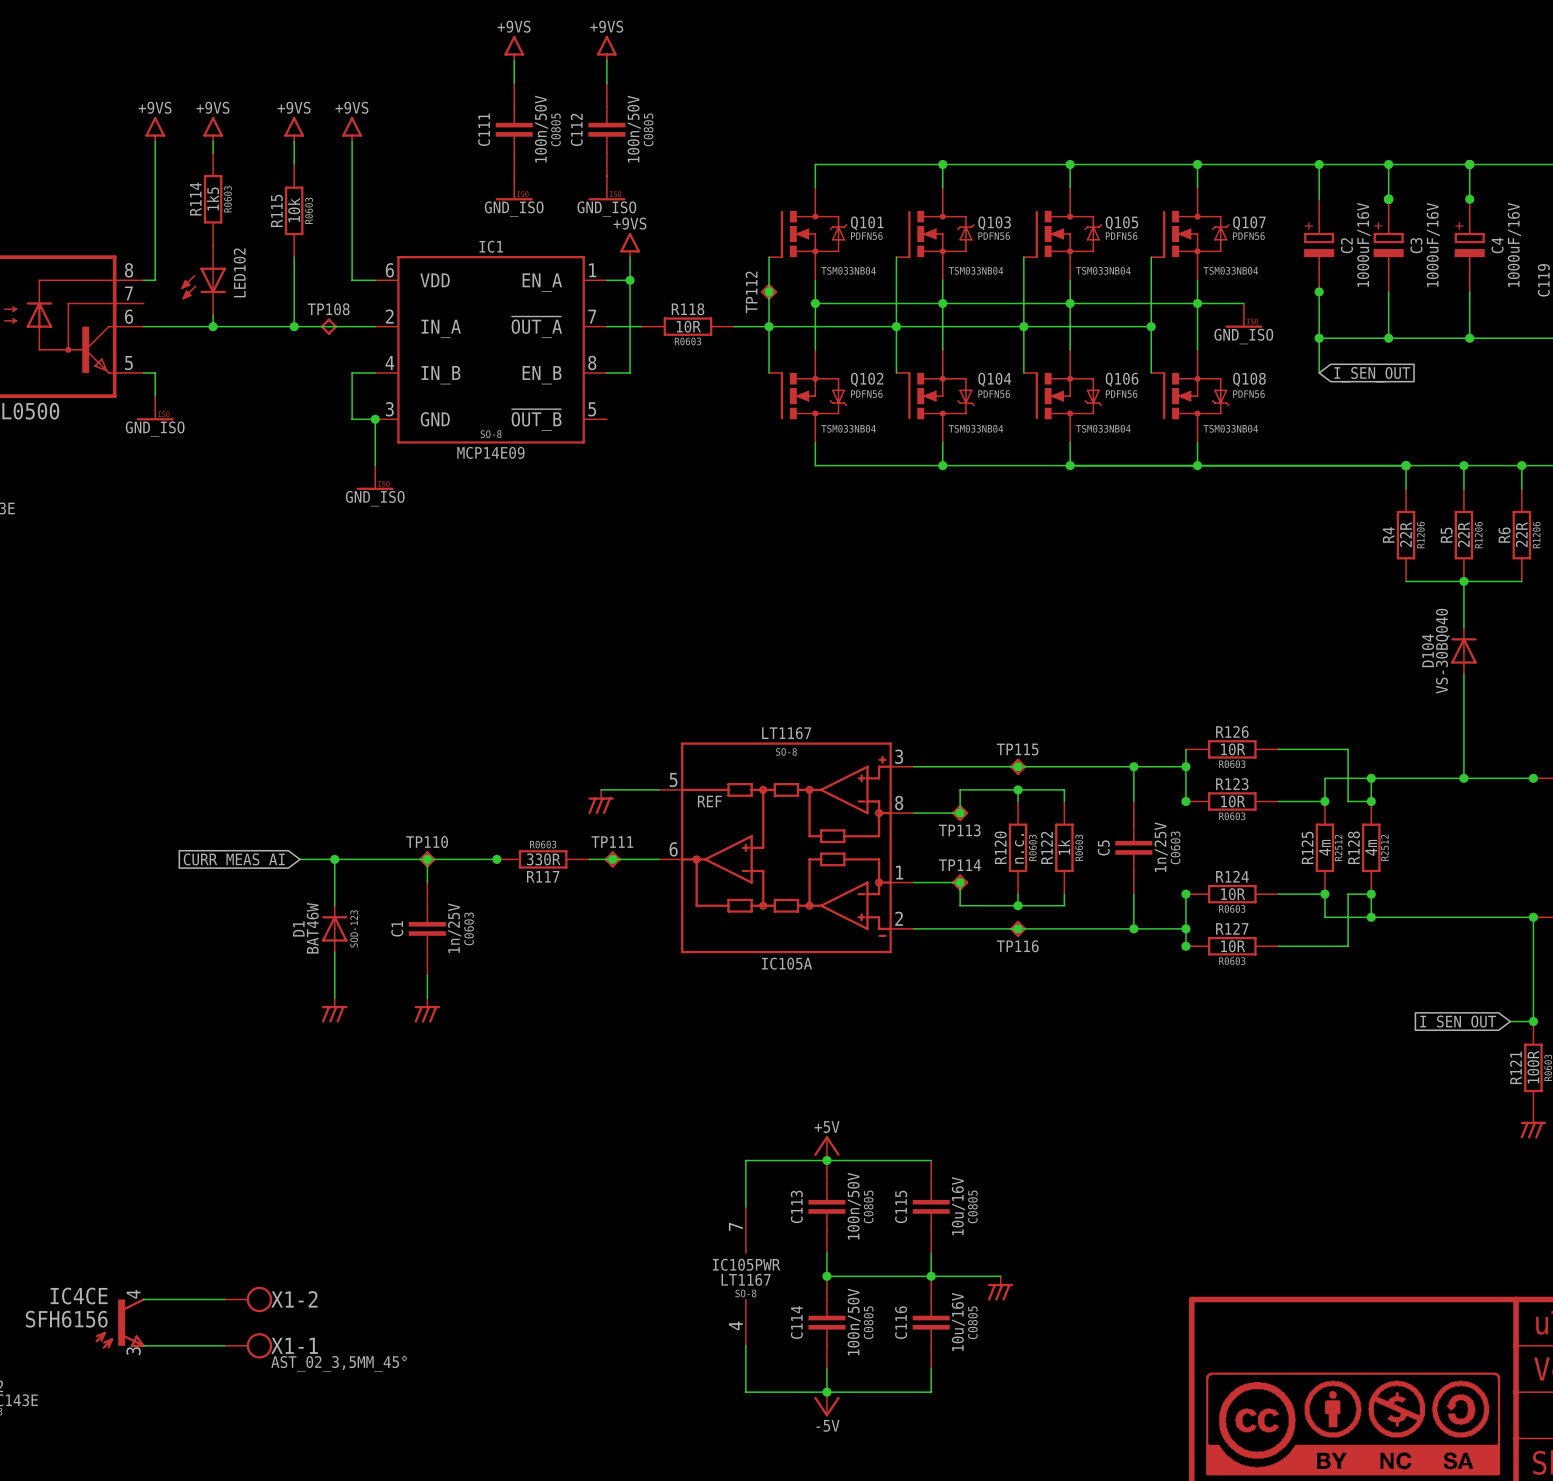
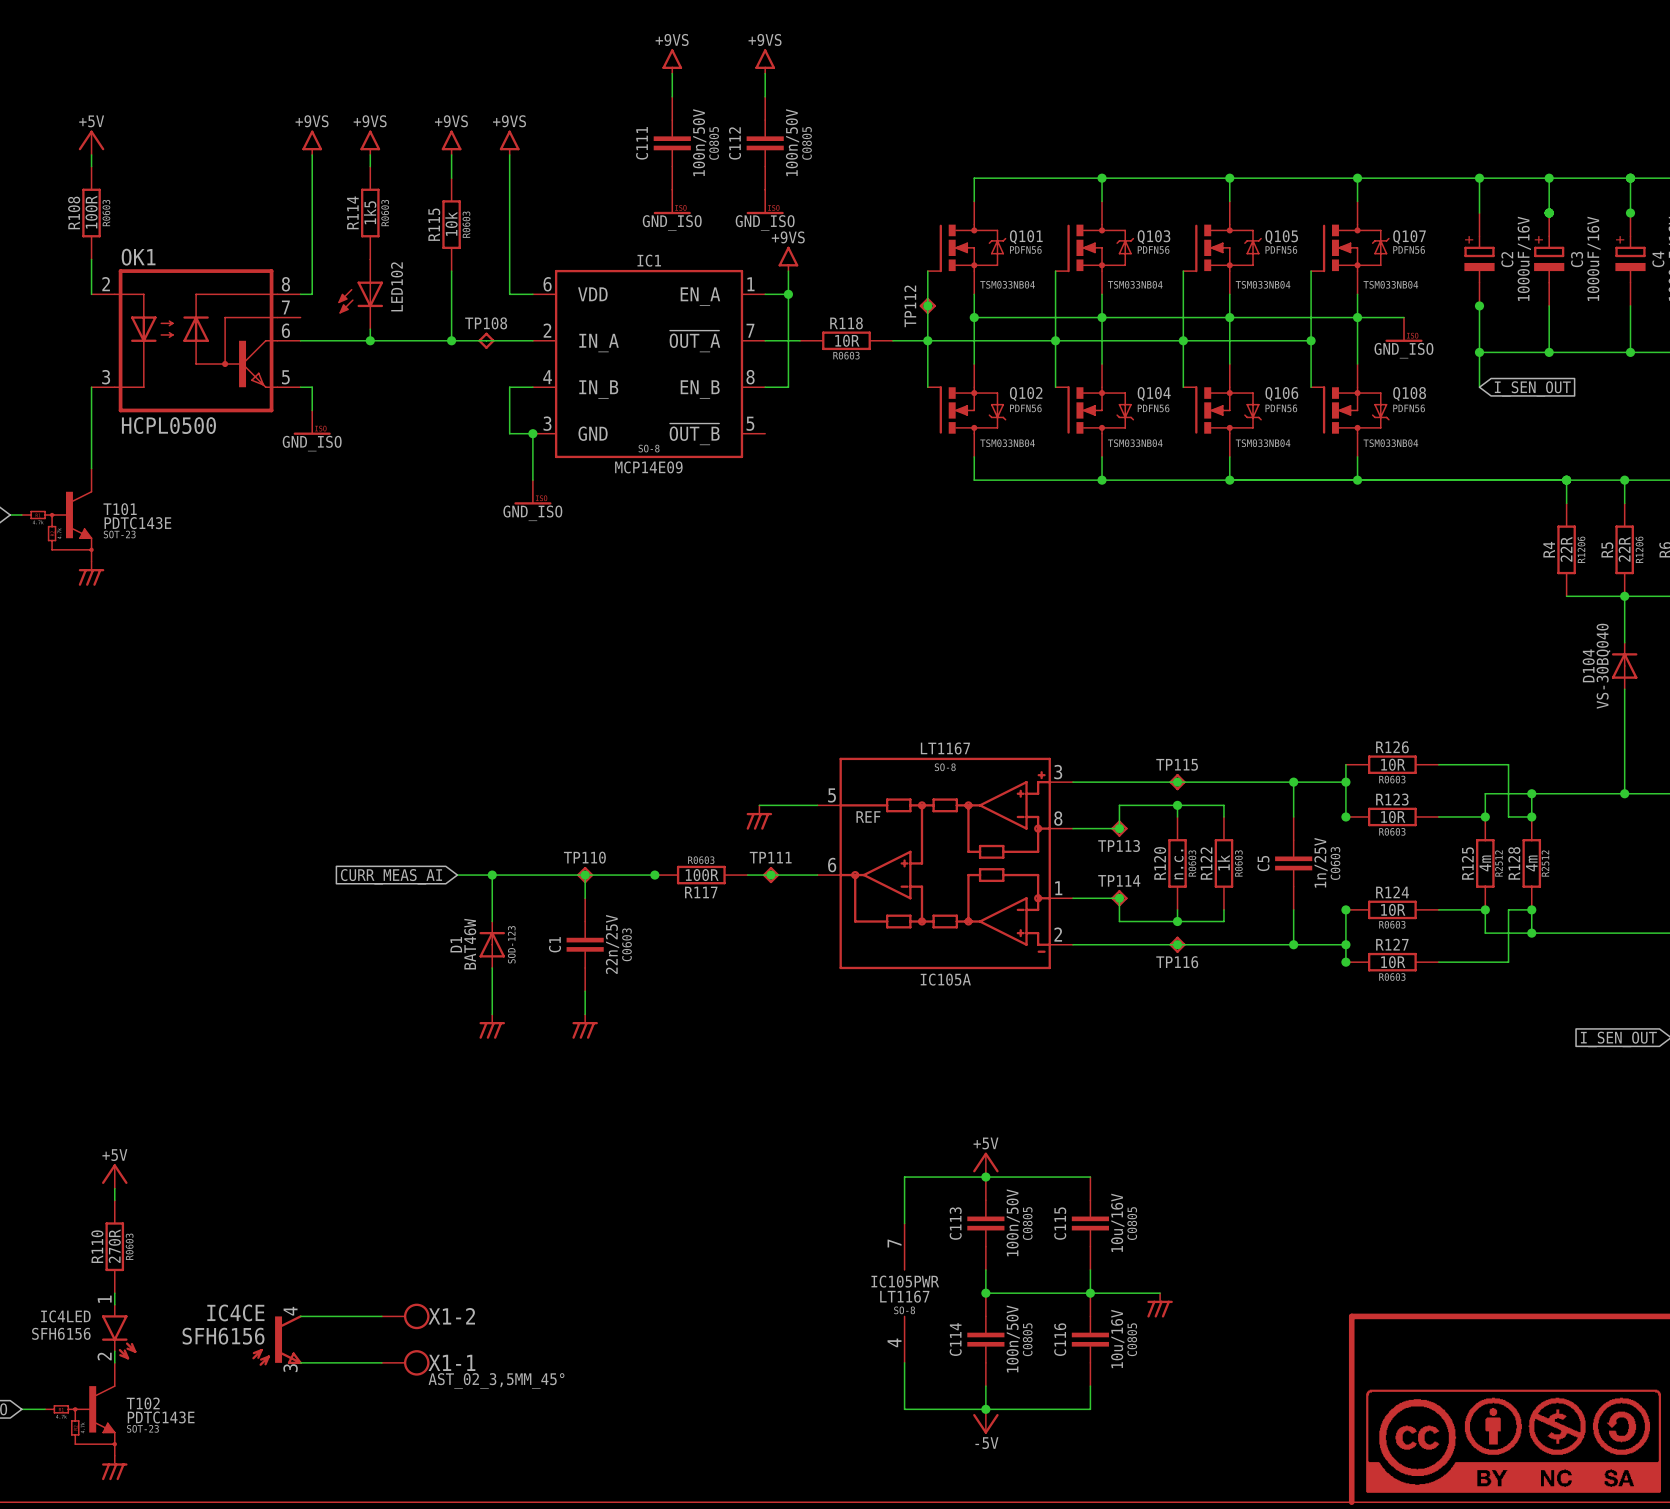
R117 value: 330R (543, 859) -> 100R (702, 875)
C1 value: 1n/25V (454, 928) -> 22n/25V (612, 944)

